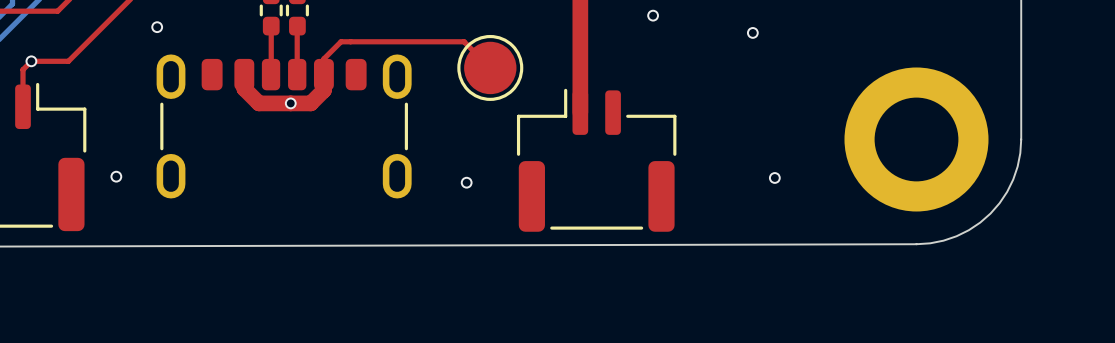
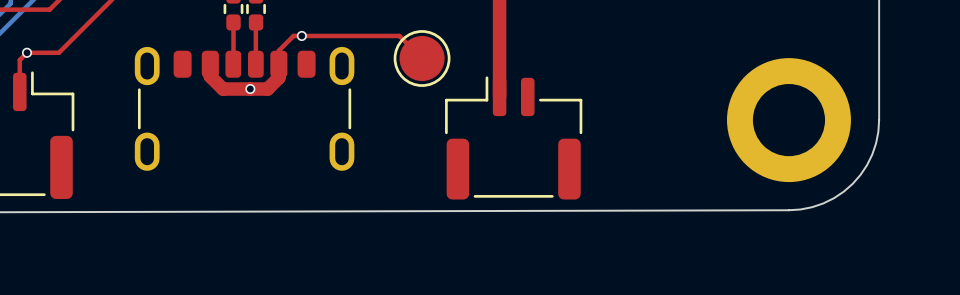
via: (653, 15) -> none
via: (157, 27) -> none
via: (752, 32) -> none
via: none -> (301, 35)
via: (116, 176) -> none
via: (774, 177) -> none
via: (466, 182) -> none

